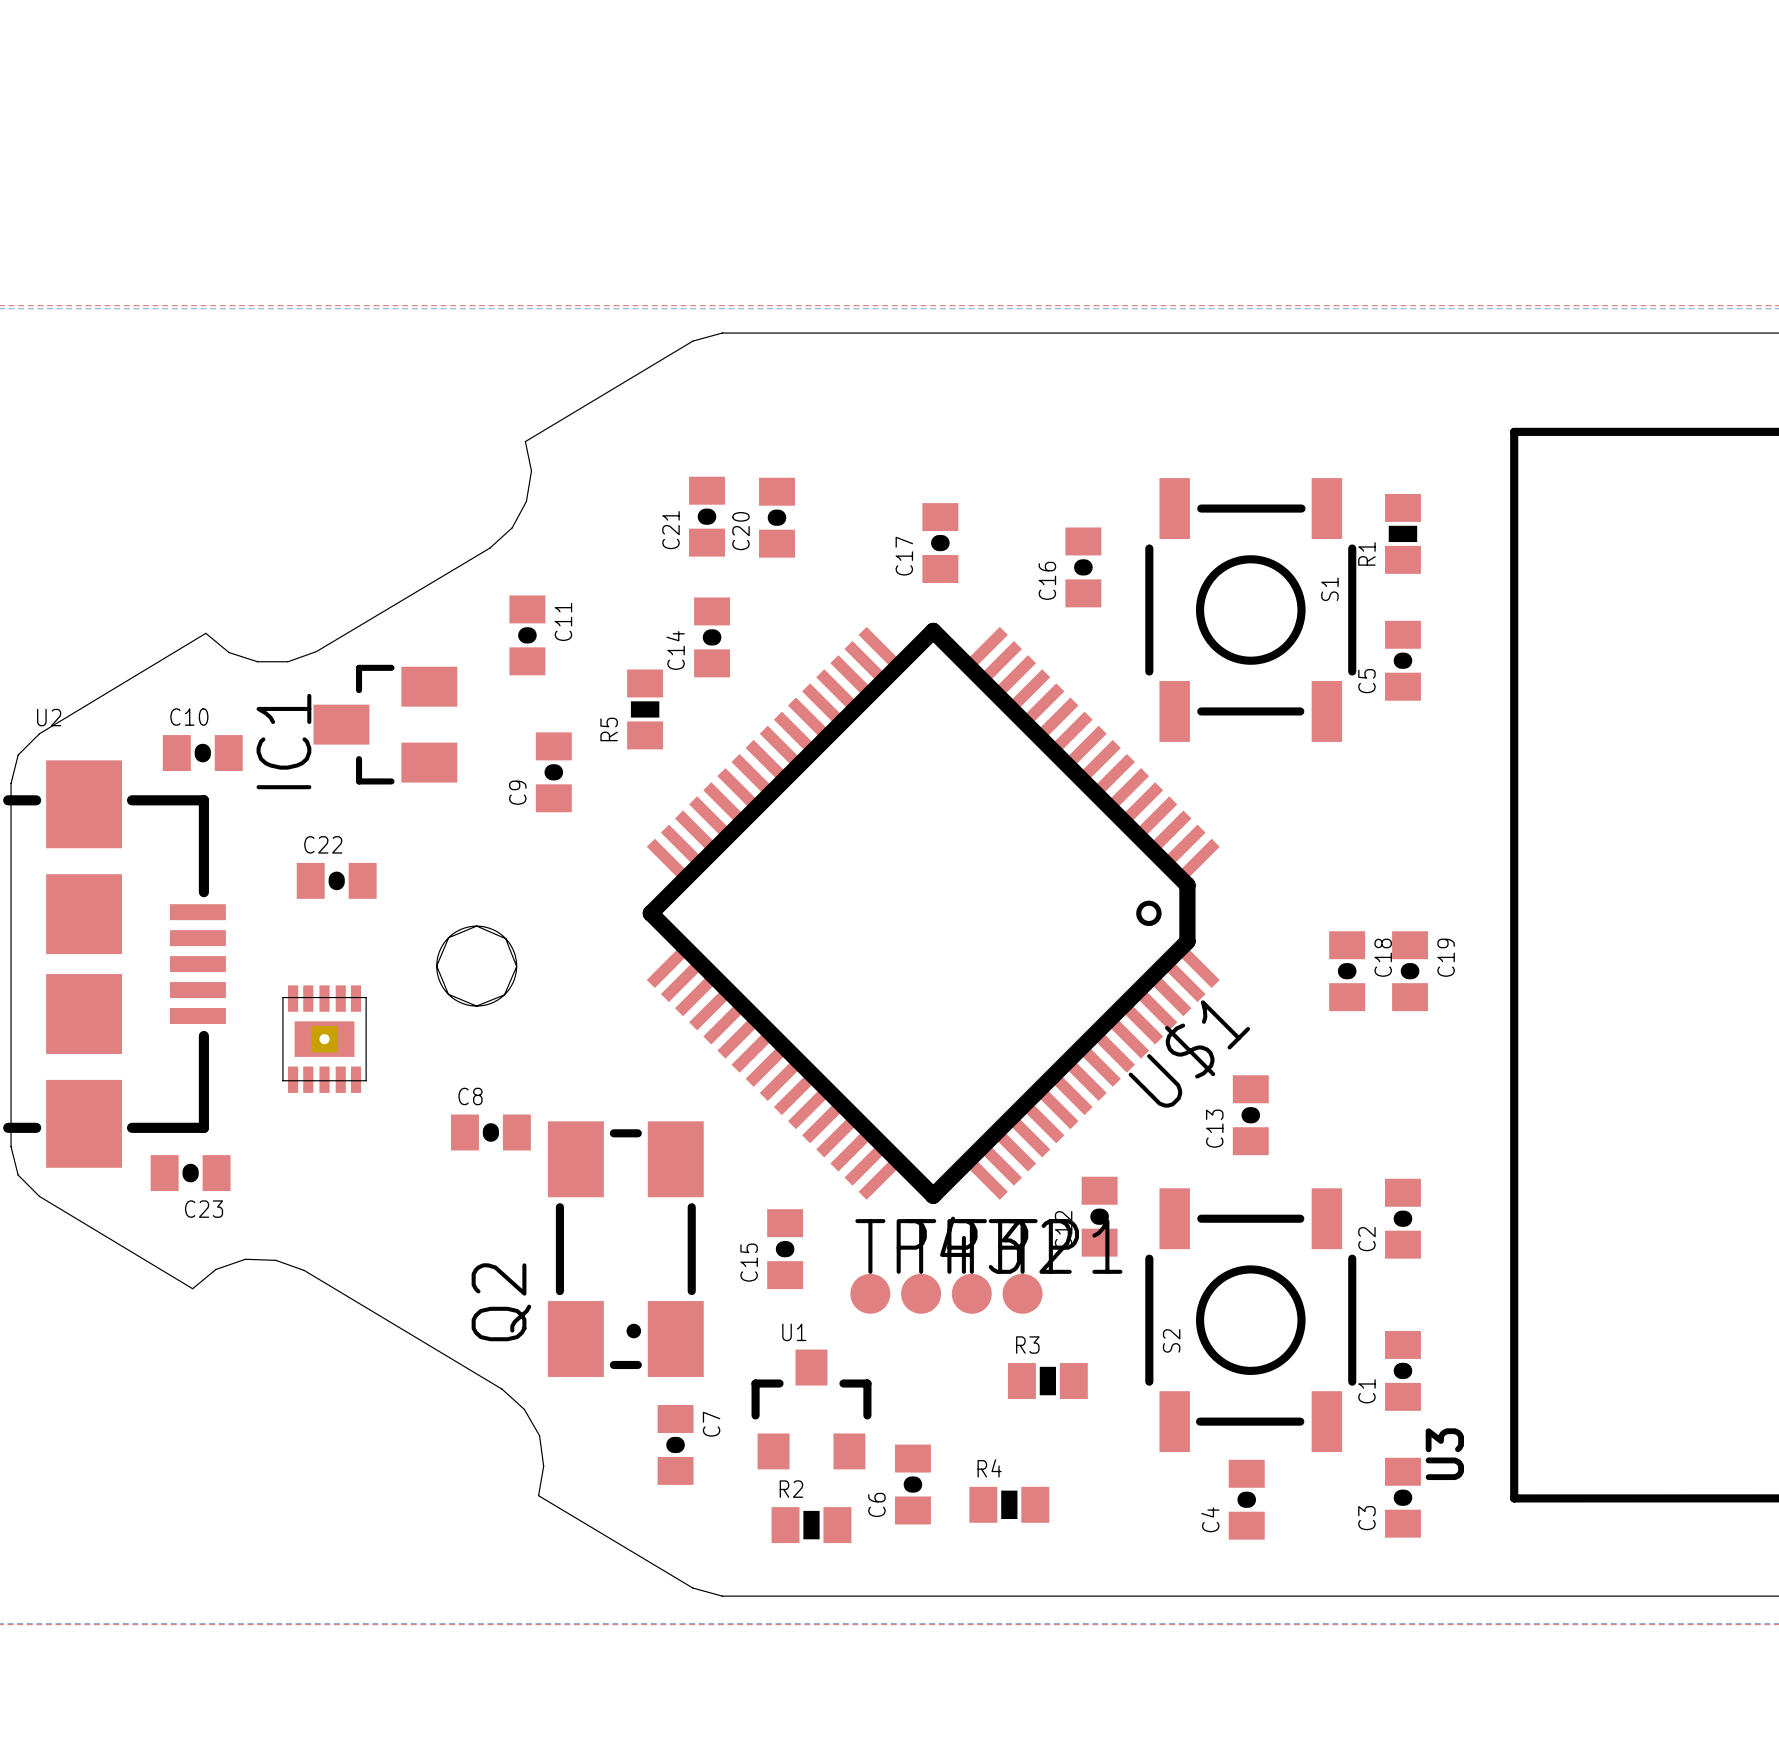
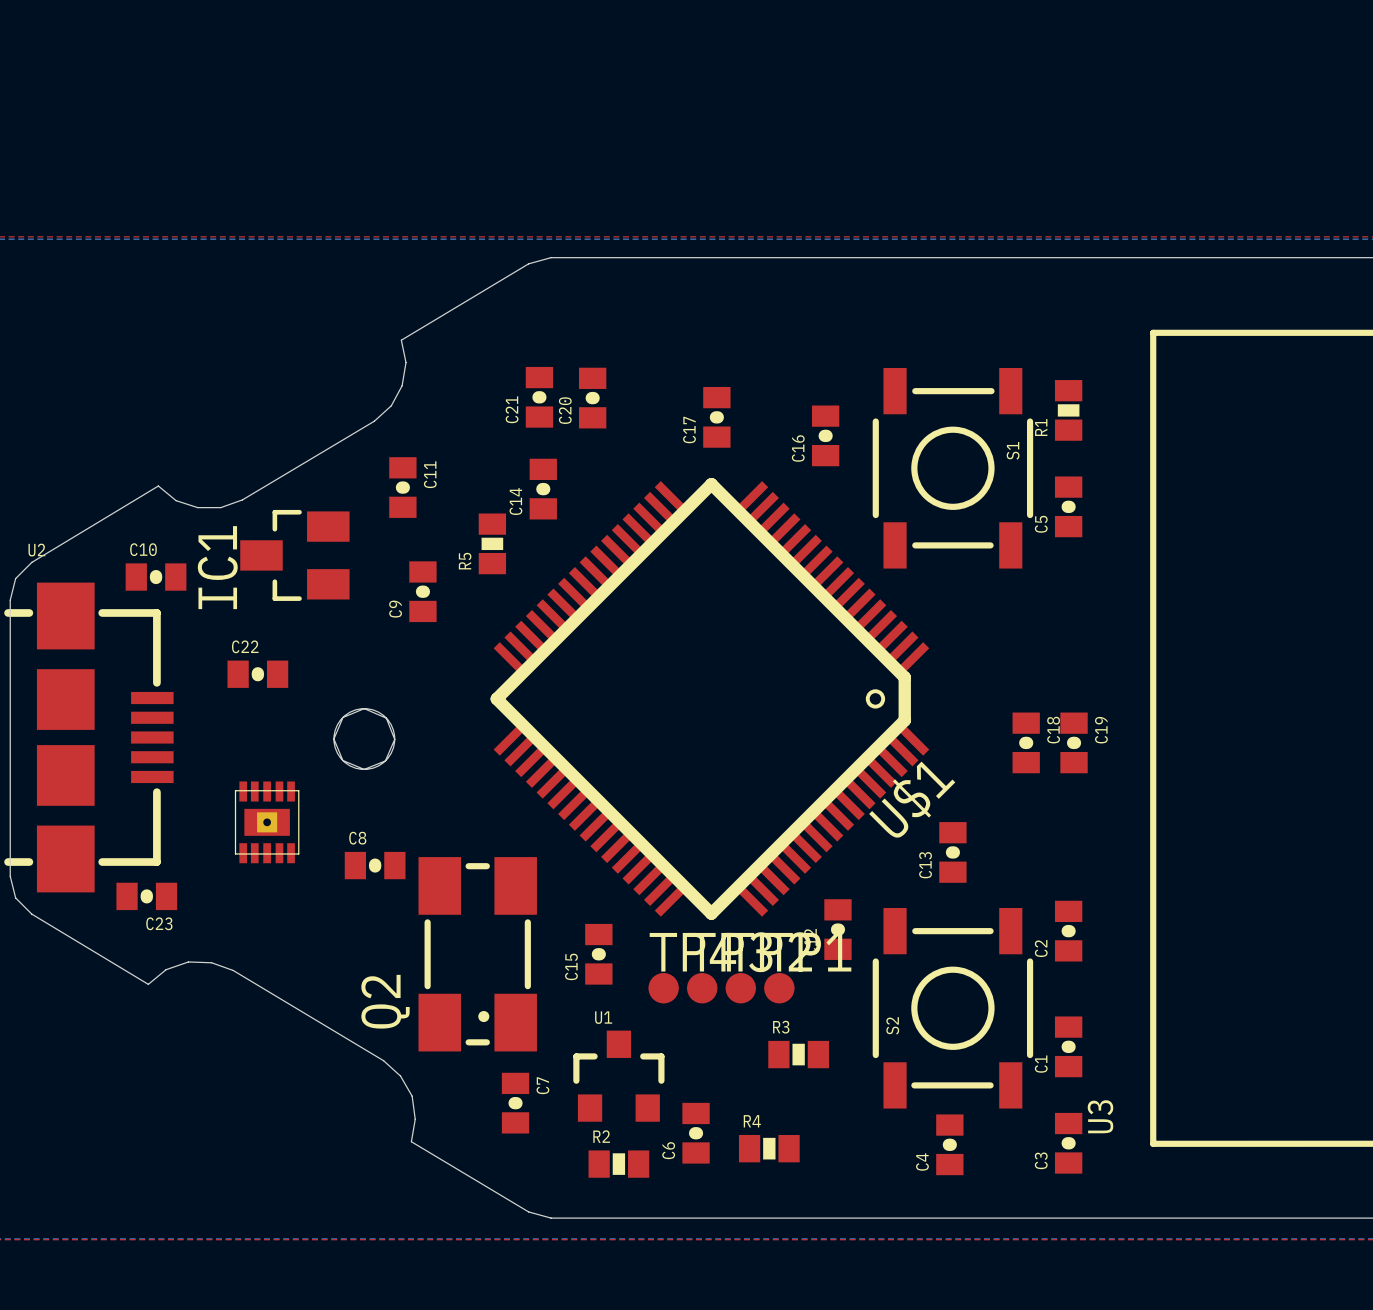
part position: (324, 1039) -> (267, 822)

